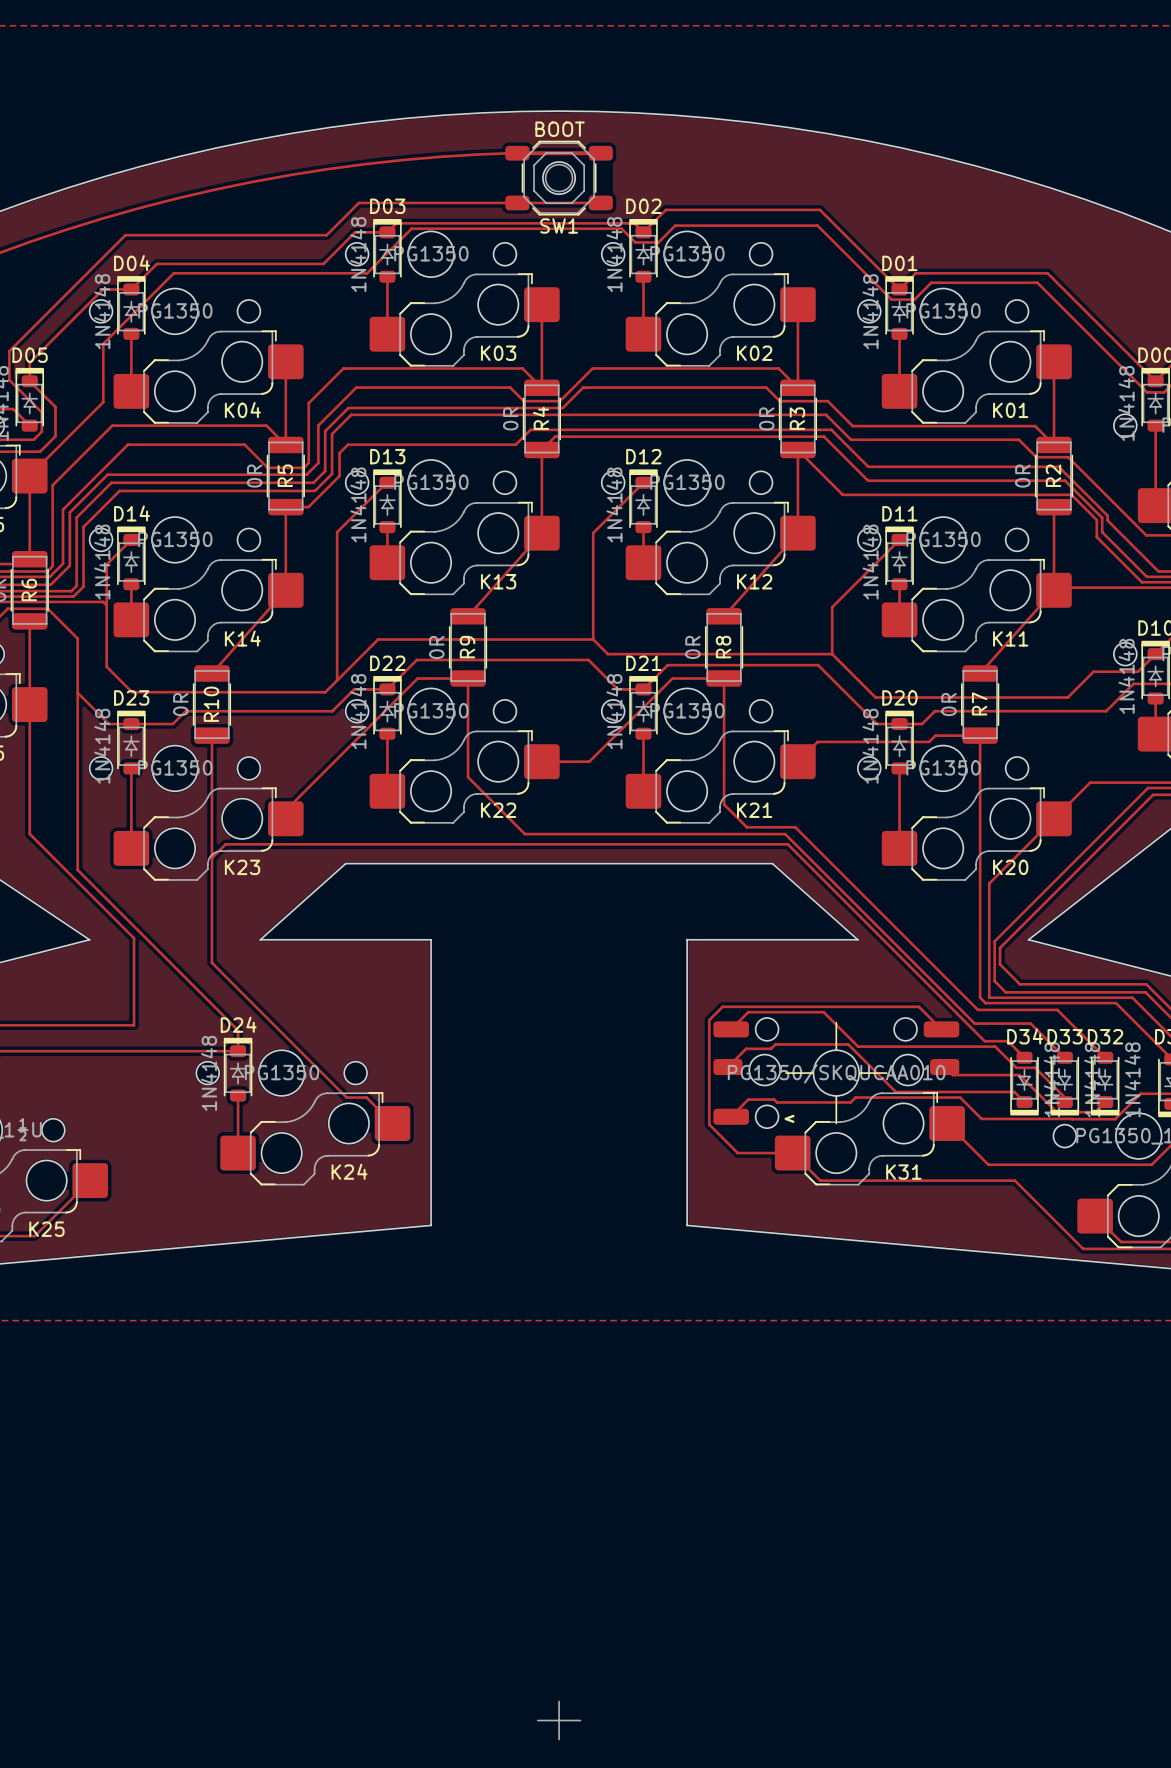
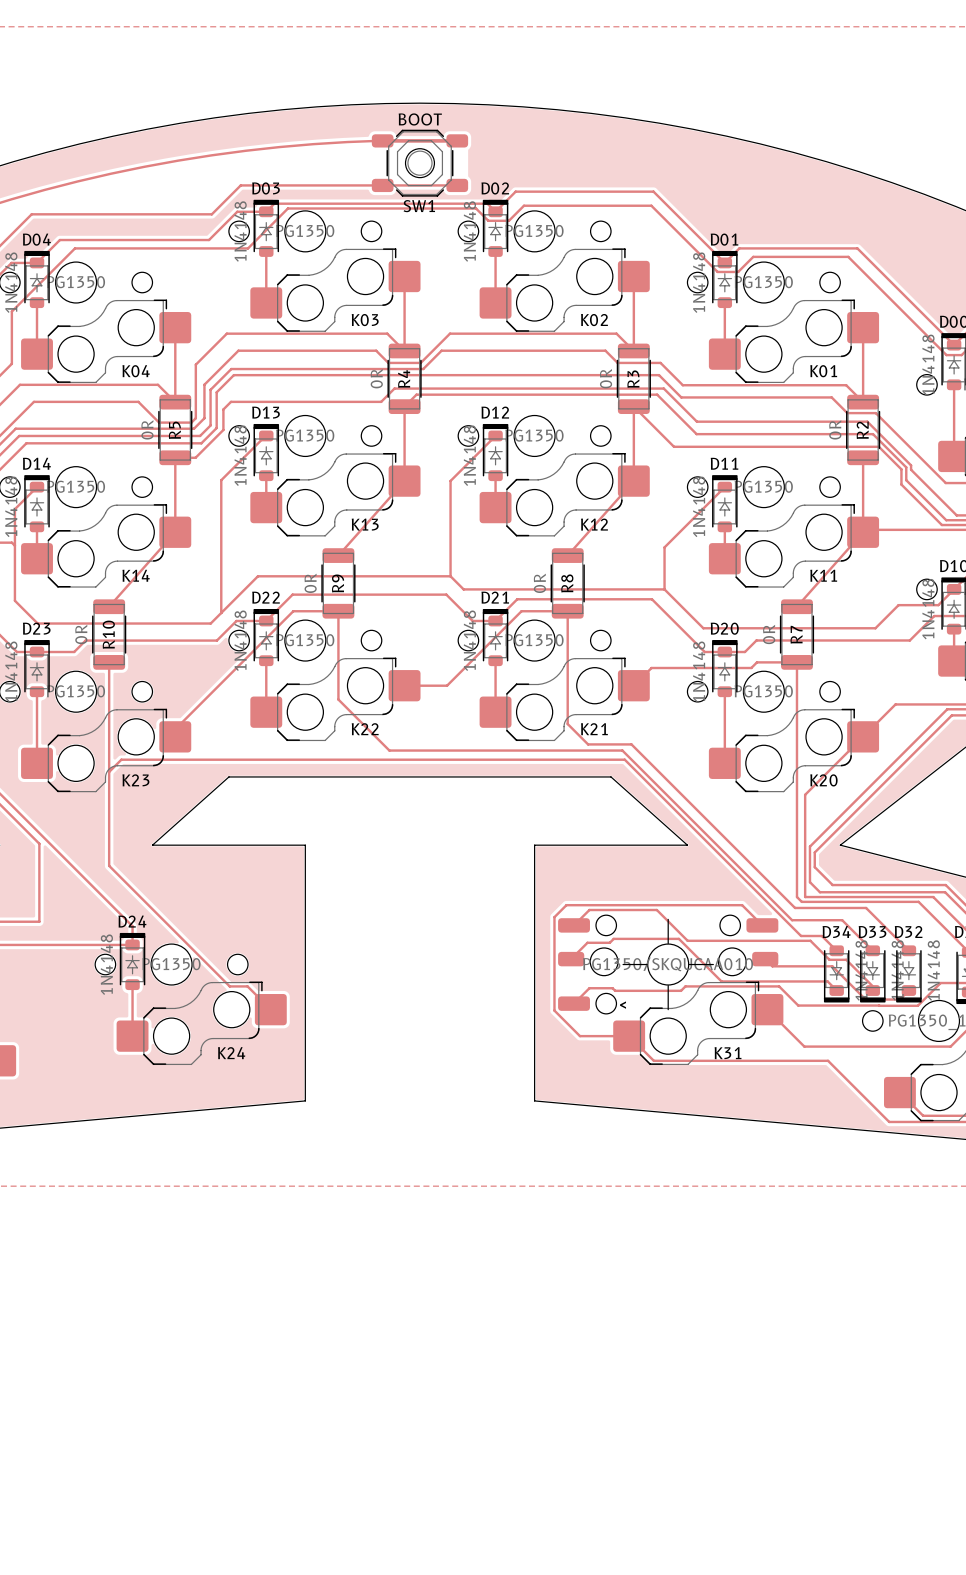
line: (559, 1701) (559, 1739) -> none
line: (537, 1720) (580, 1720) -> none

